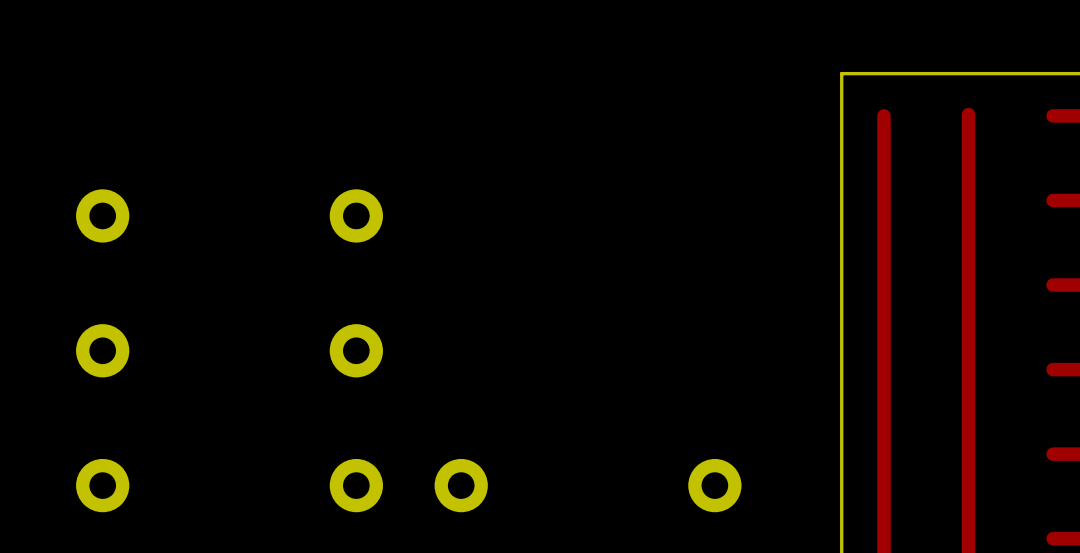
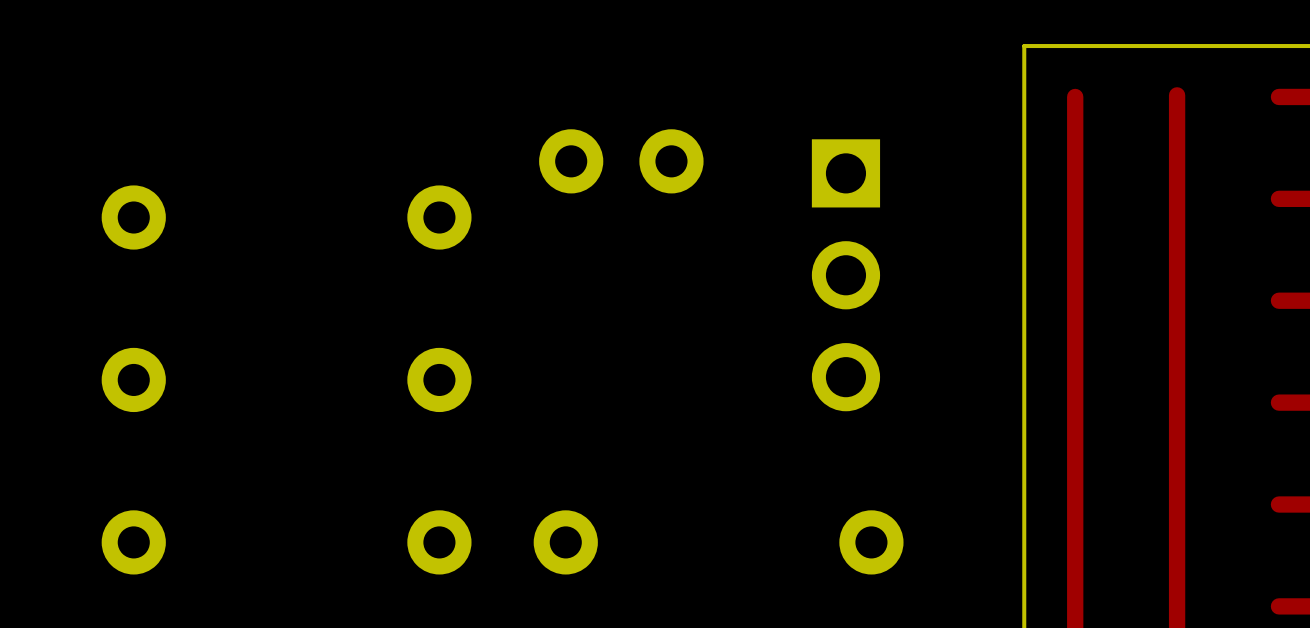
part: none -> (621, 161)
part: none -> (845, 275)

